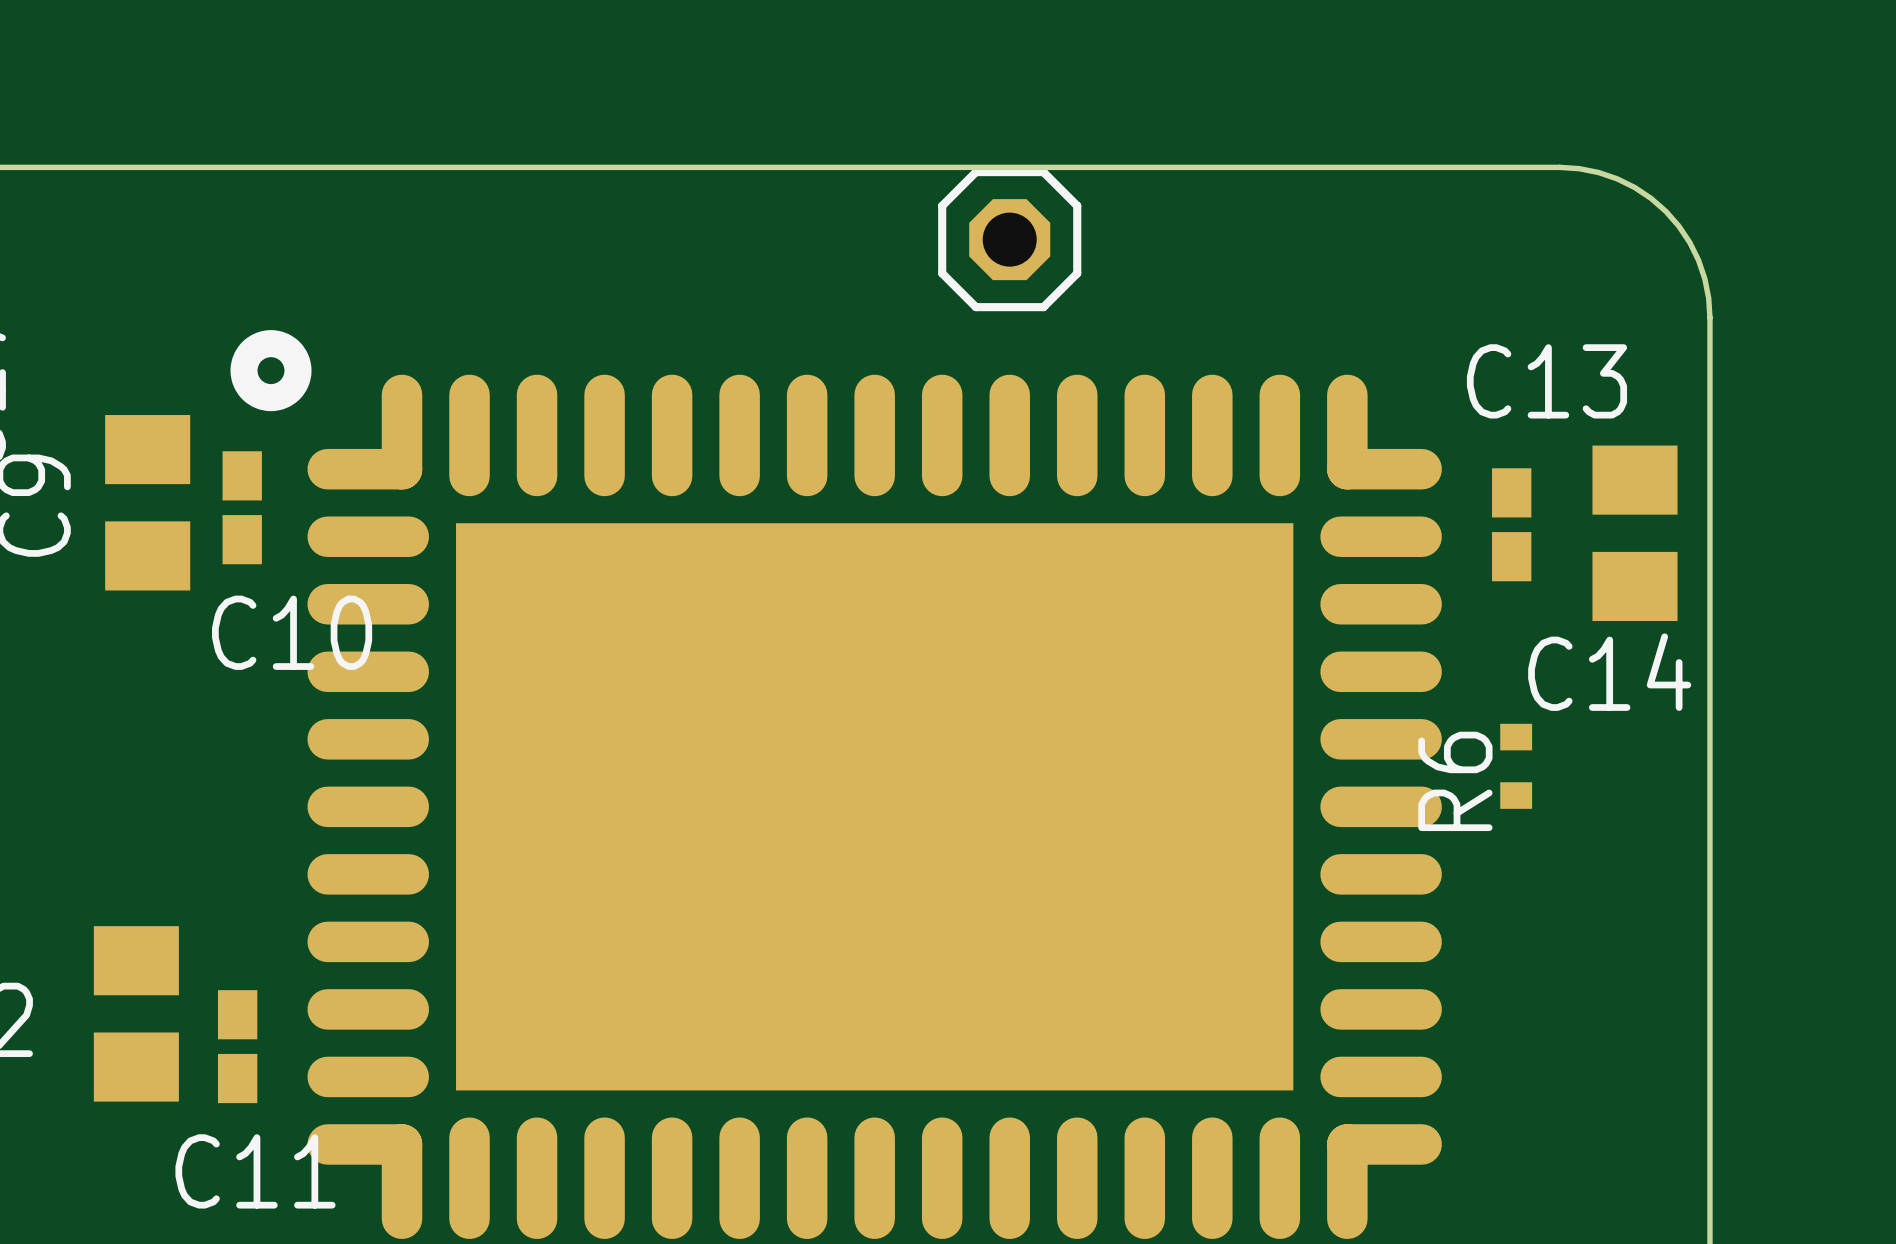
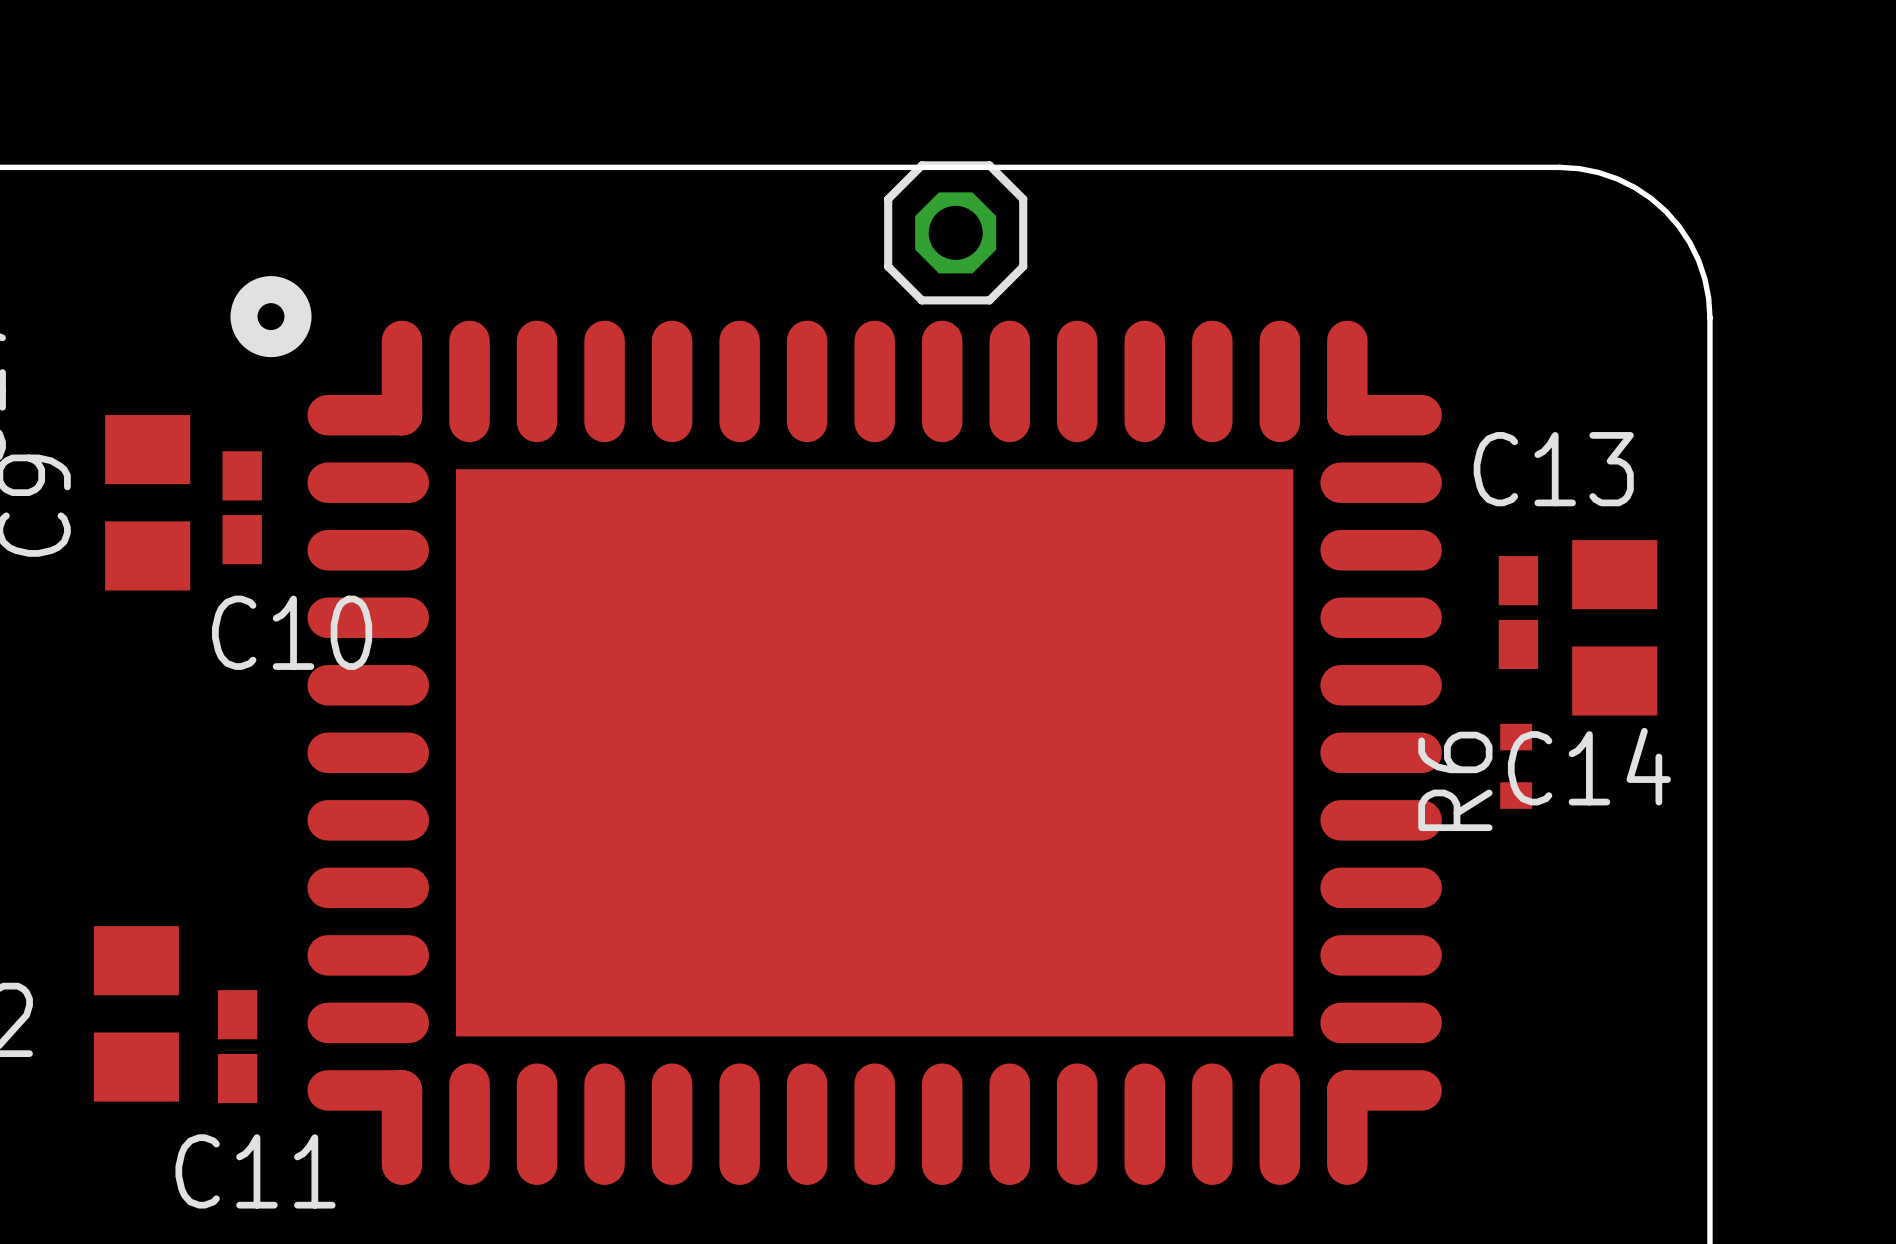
part position: (1009, 239) -> (955, 232)
C13 position: (1511, 524) -> (1518, 612)
C14 position: (1634, 533) -> (1614, 627)
part position: (836, 784) -> (836, 730)

